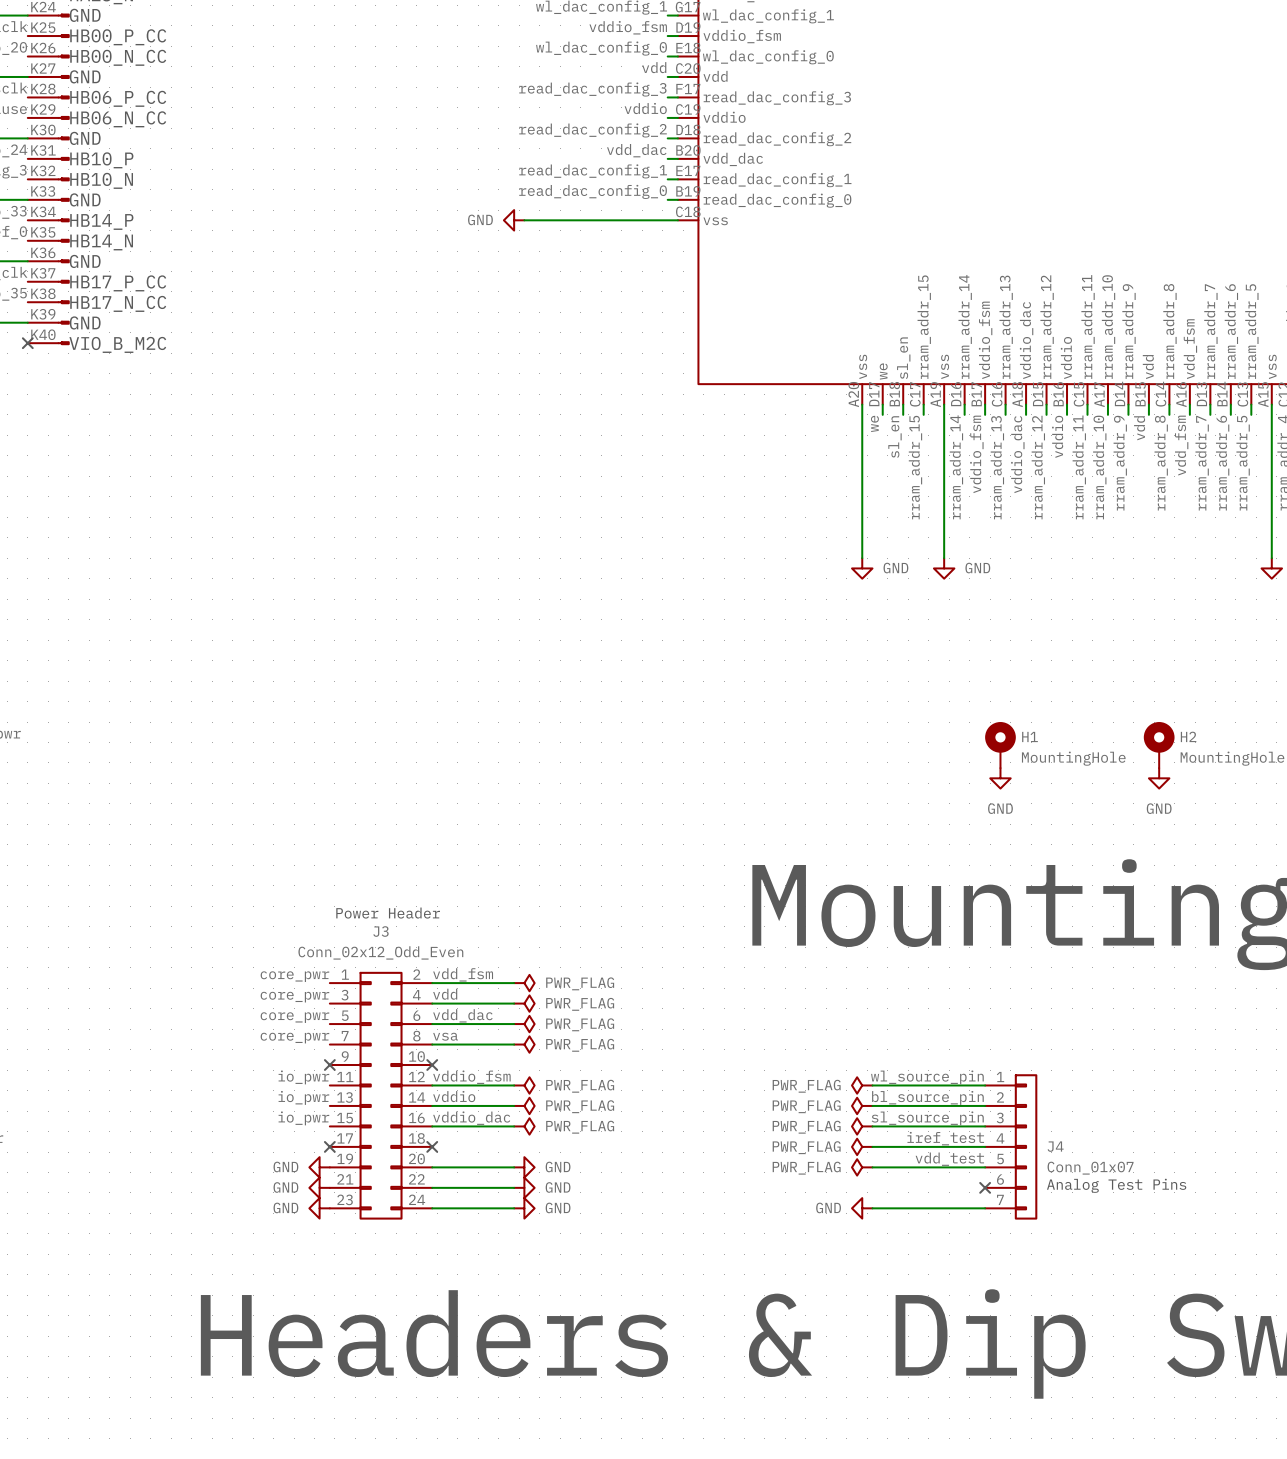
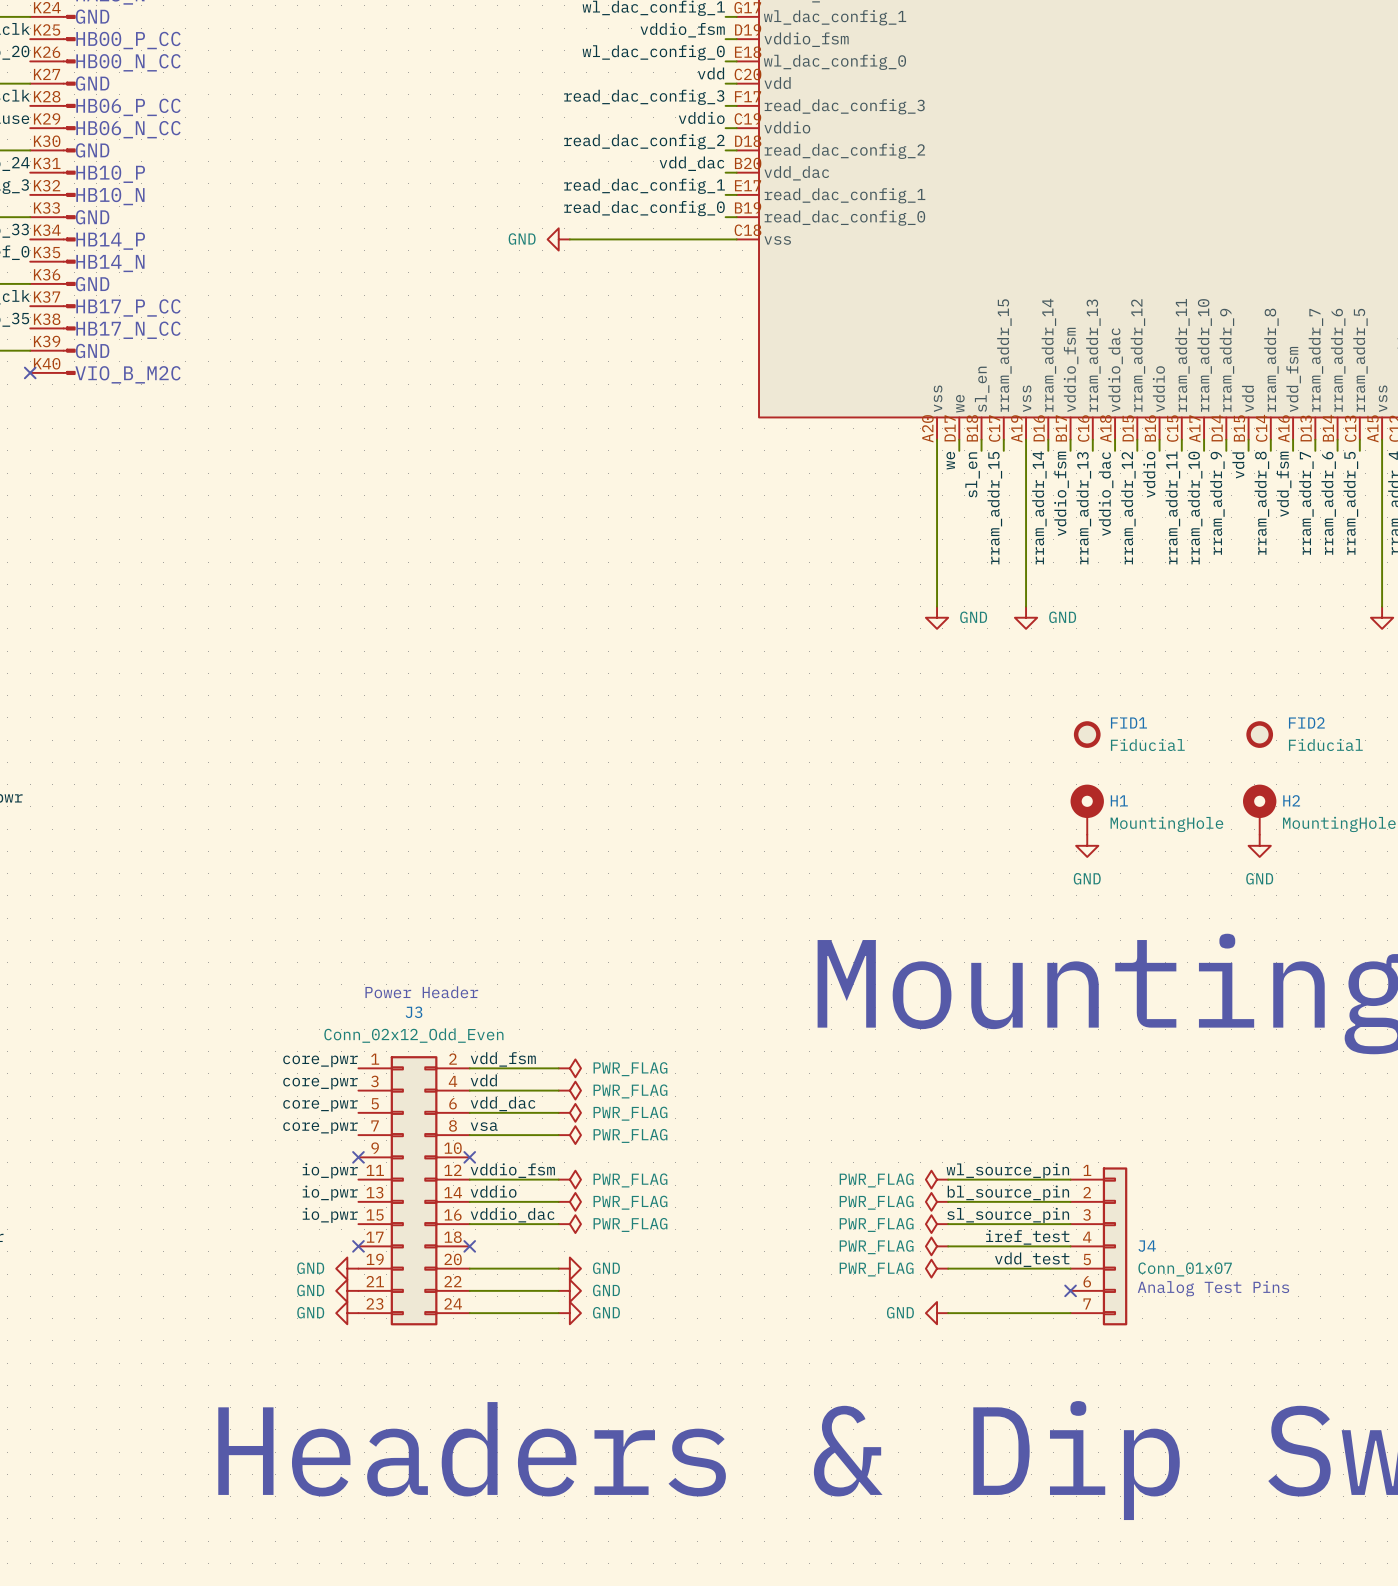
FID1: none -> Fiducial (1087, 734)
FID2: none -> Fiducial (1259, 734)

